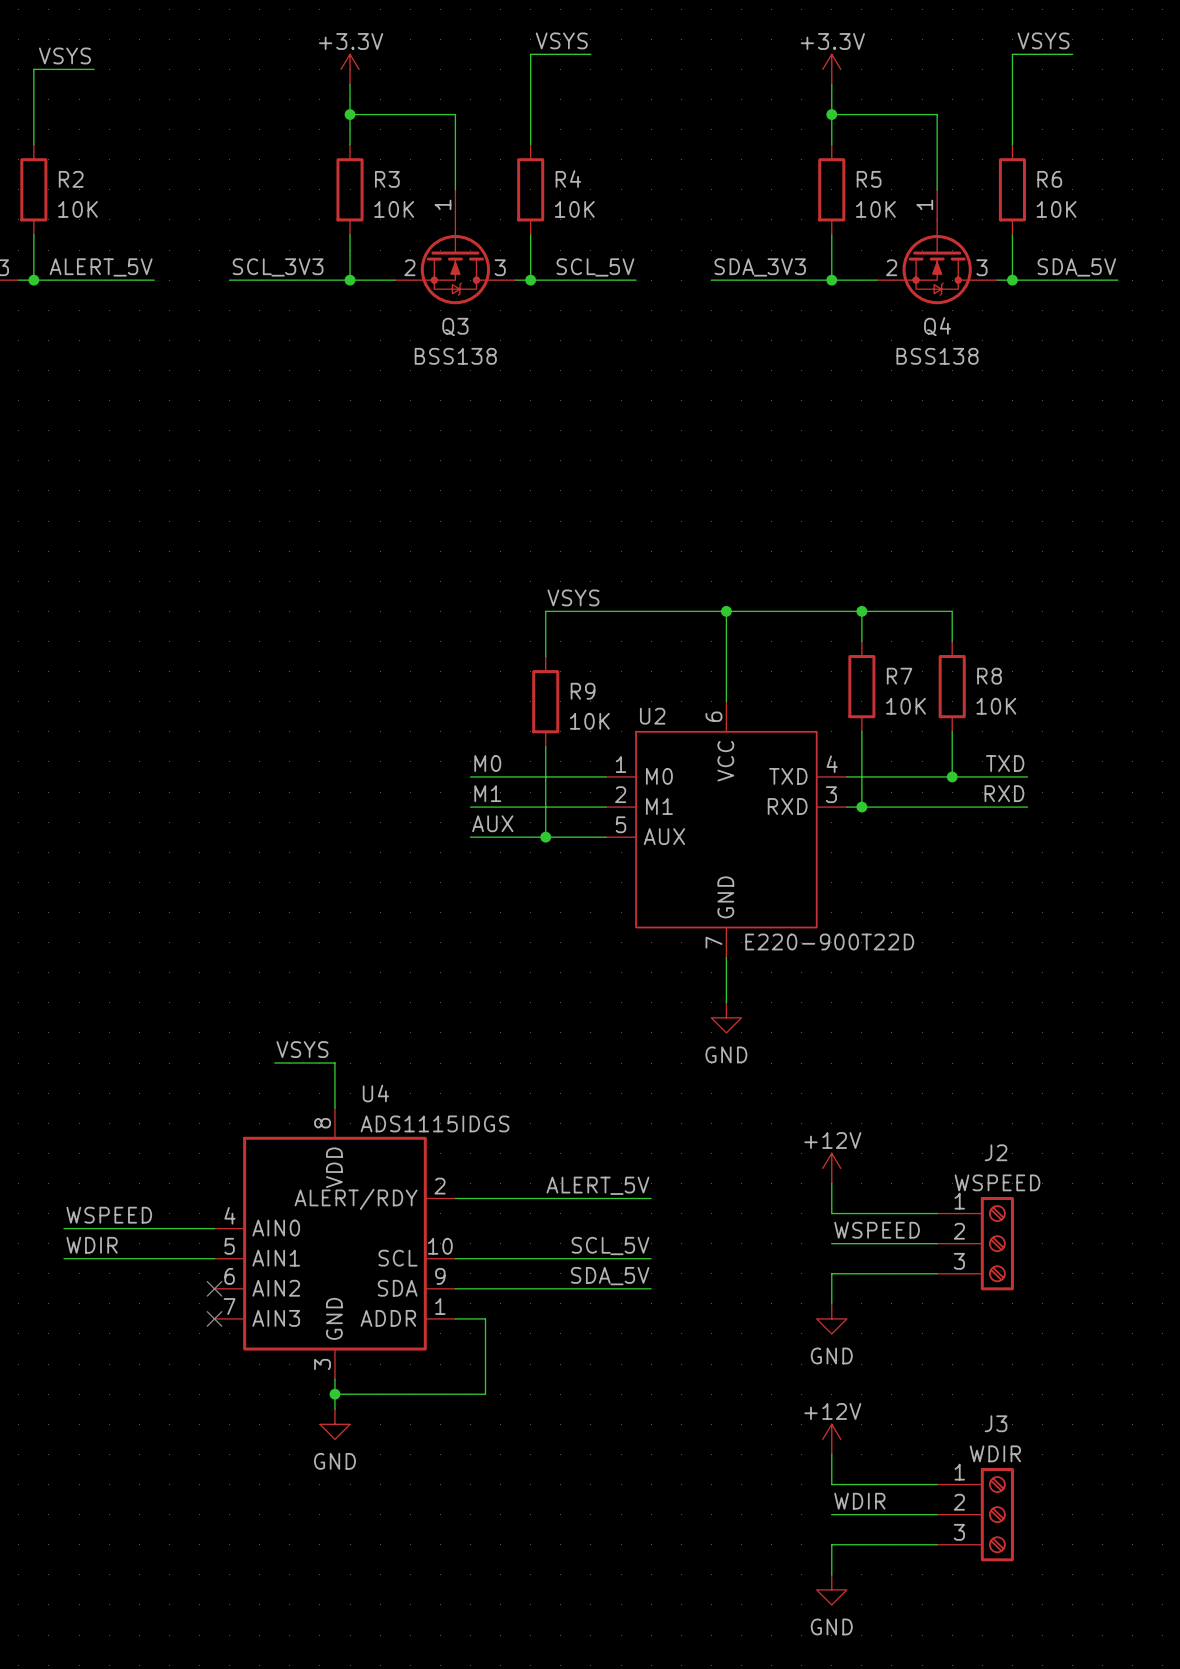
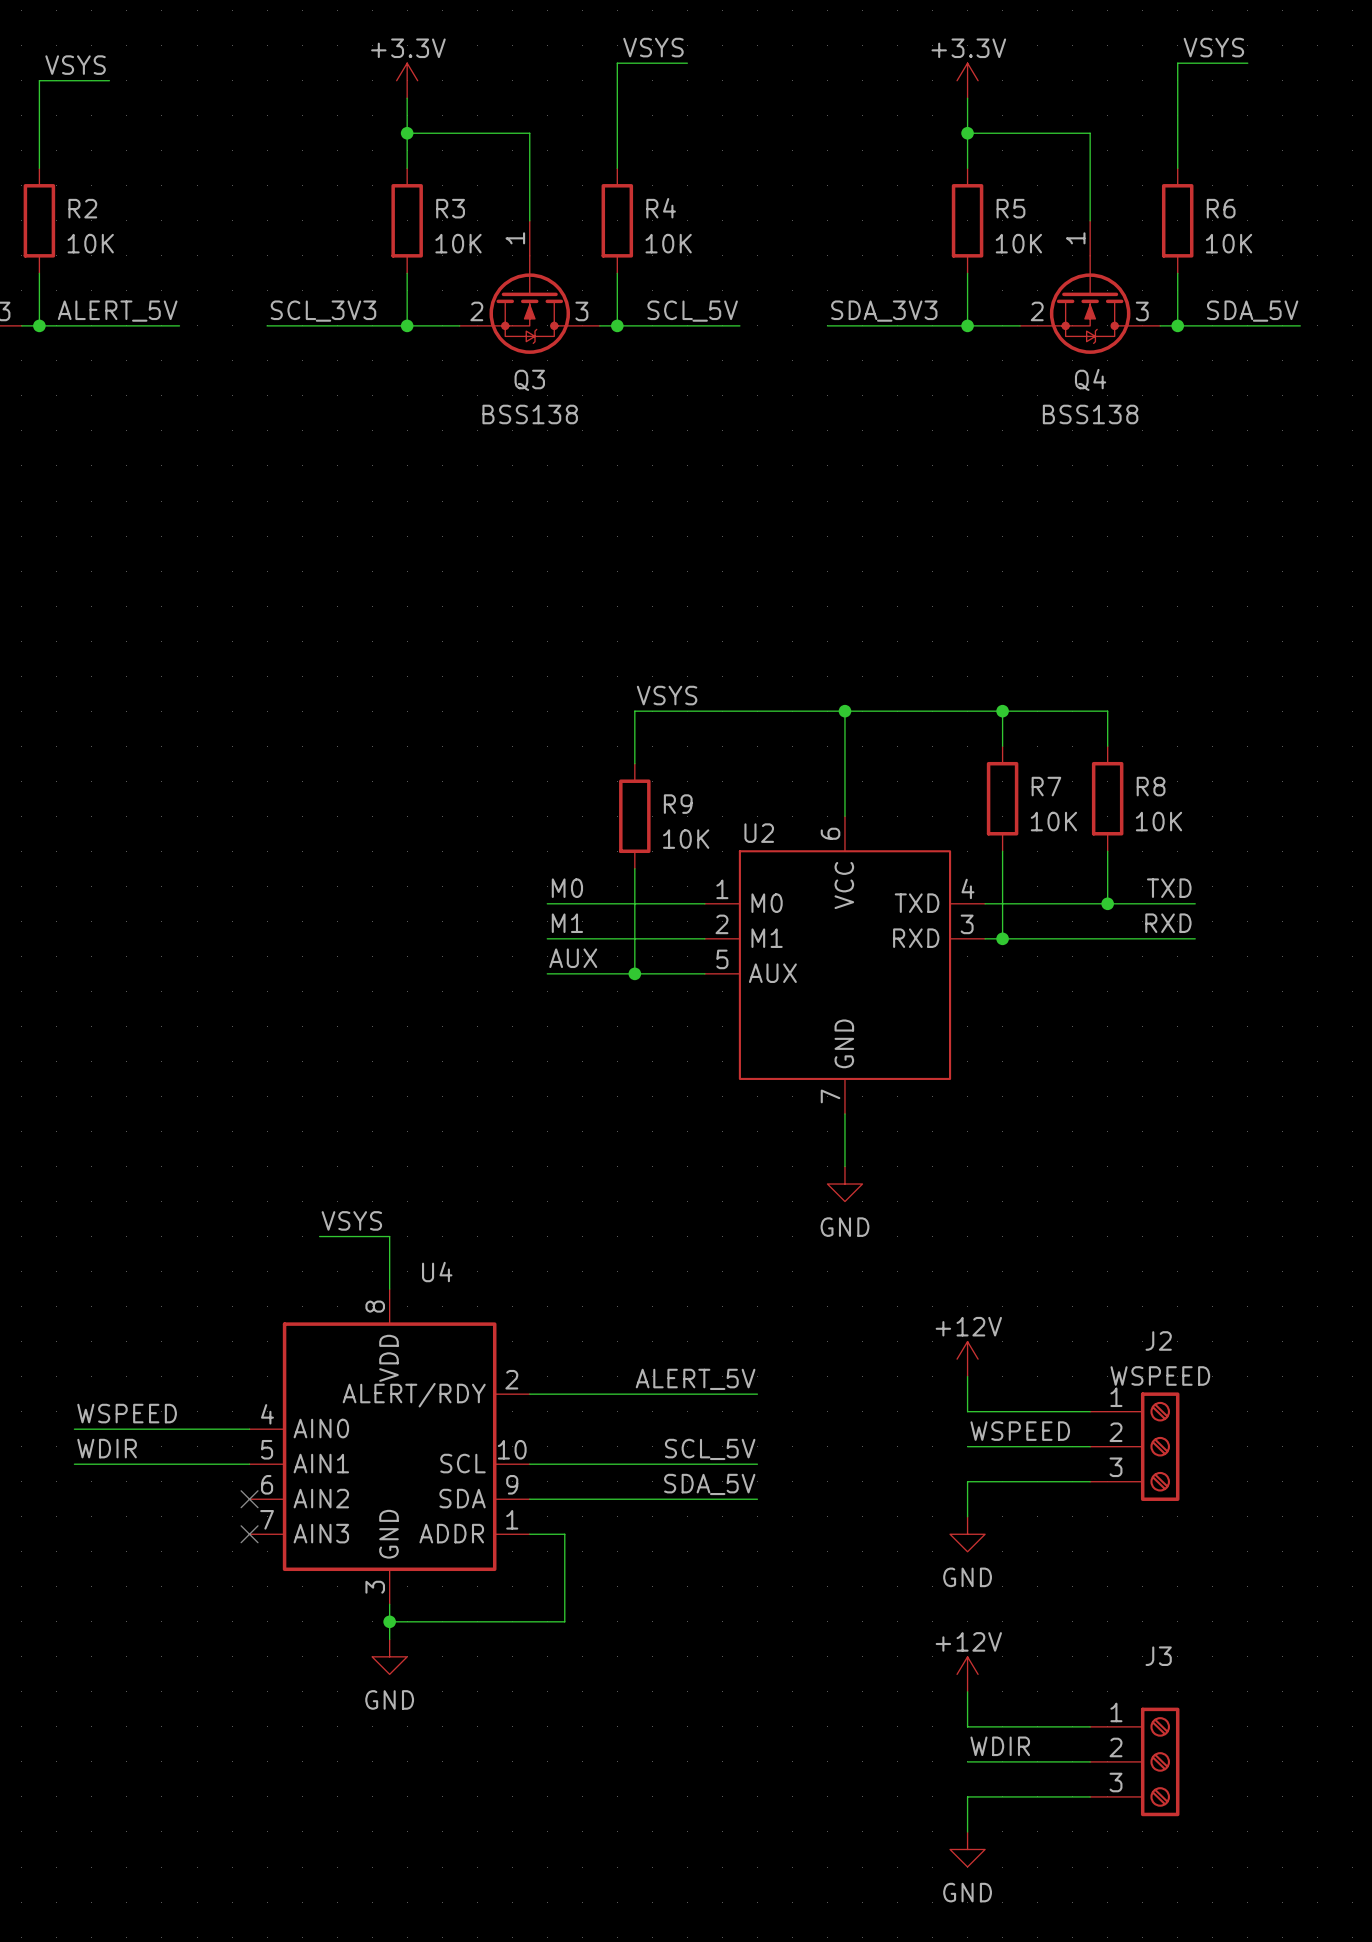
U2 value: E220-900T22D (829, 942) -> none
U4 value: ADS1115IDGS (435, 1123) -> none
J3 value: WDIR (995, 1453) -> none

